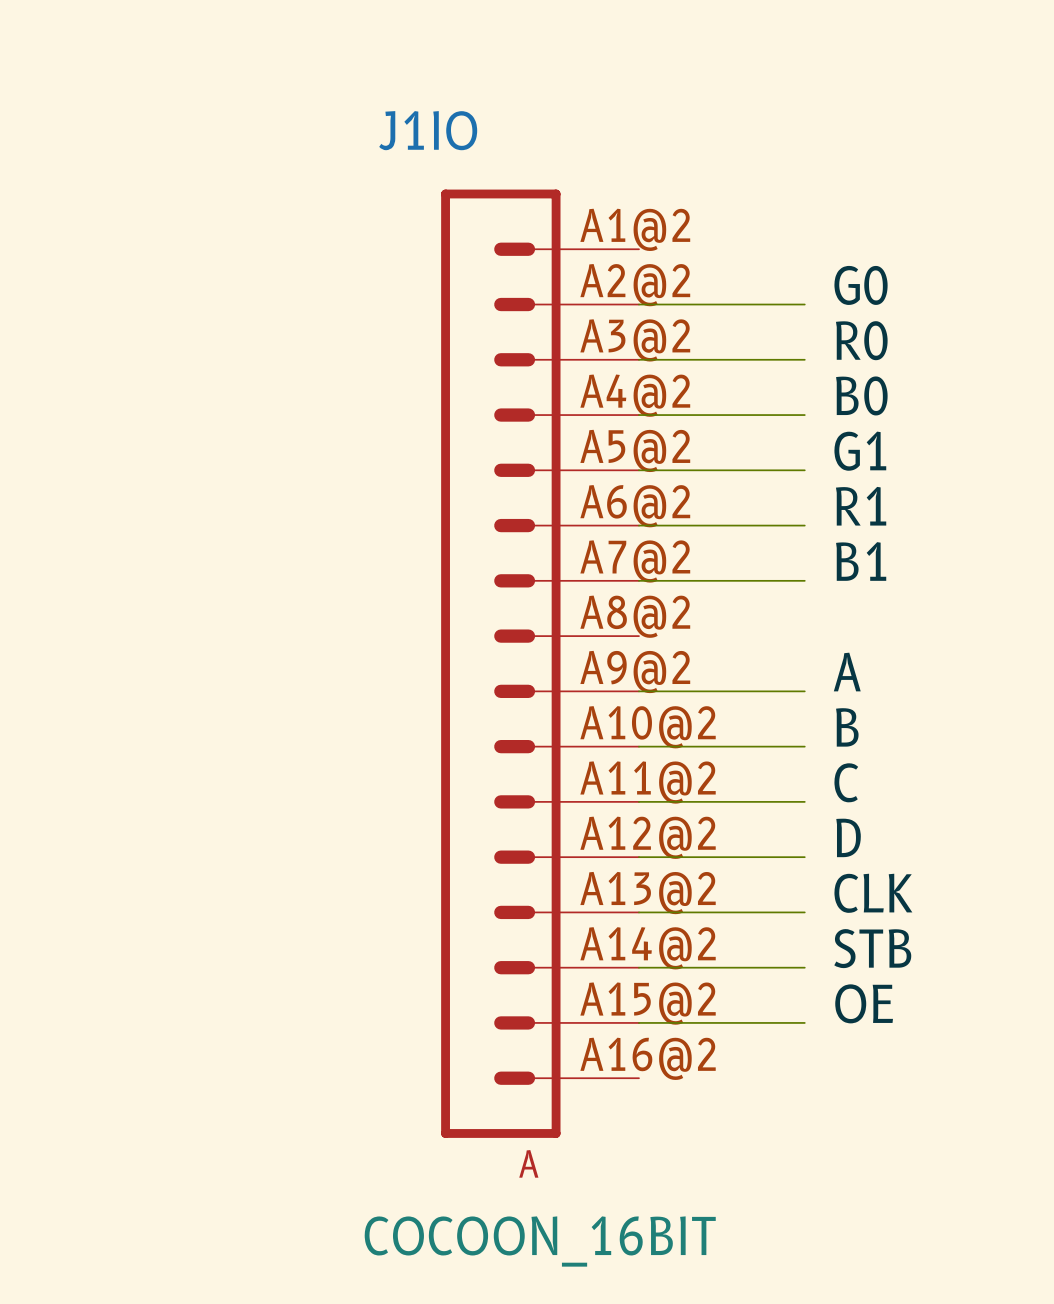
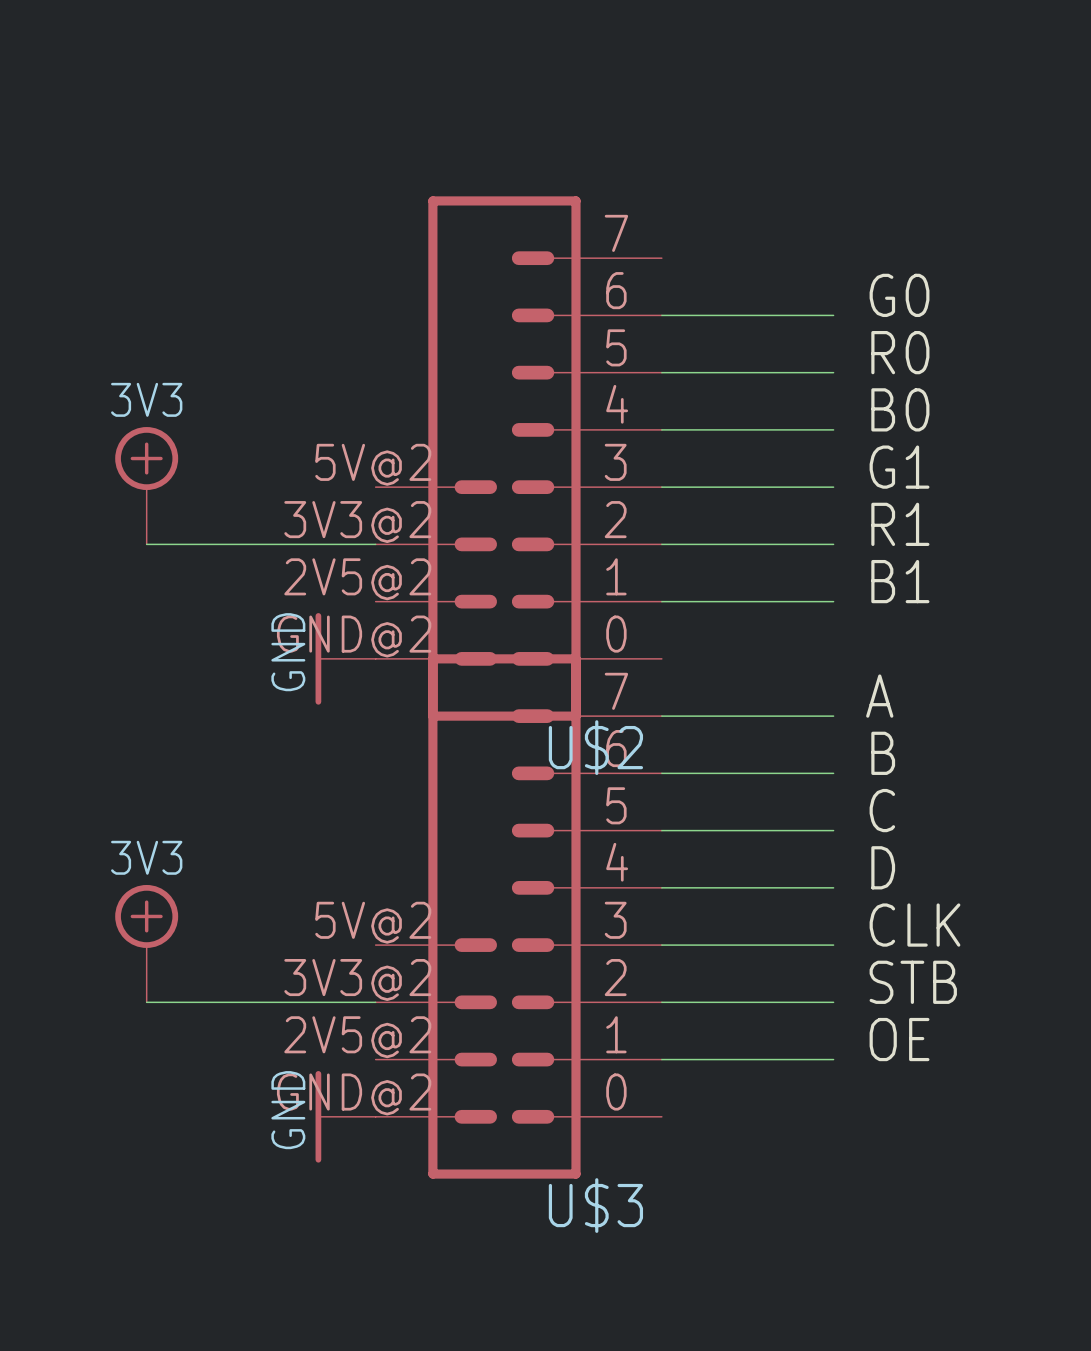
U$2: none -> (518, 458)
power symbol: none -> 3V3 (146, 485)
wire: none -> (146, 544) (375, 544)
power symbol: none -> GND (345, 658)
J1IO: COCOON_16BIT (540, 663) -> none
U$3: none -> (518, 916)
power symbol: none -> 3V3 (146, 943)
wire: none -> (146, 1002) (375, 1002)
power symbol: none -> GND (345, 1116)

